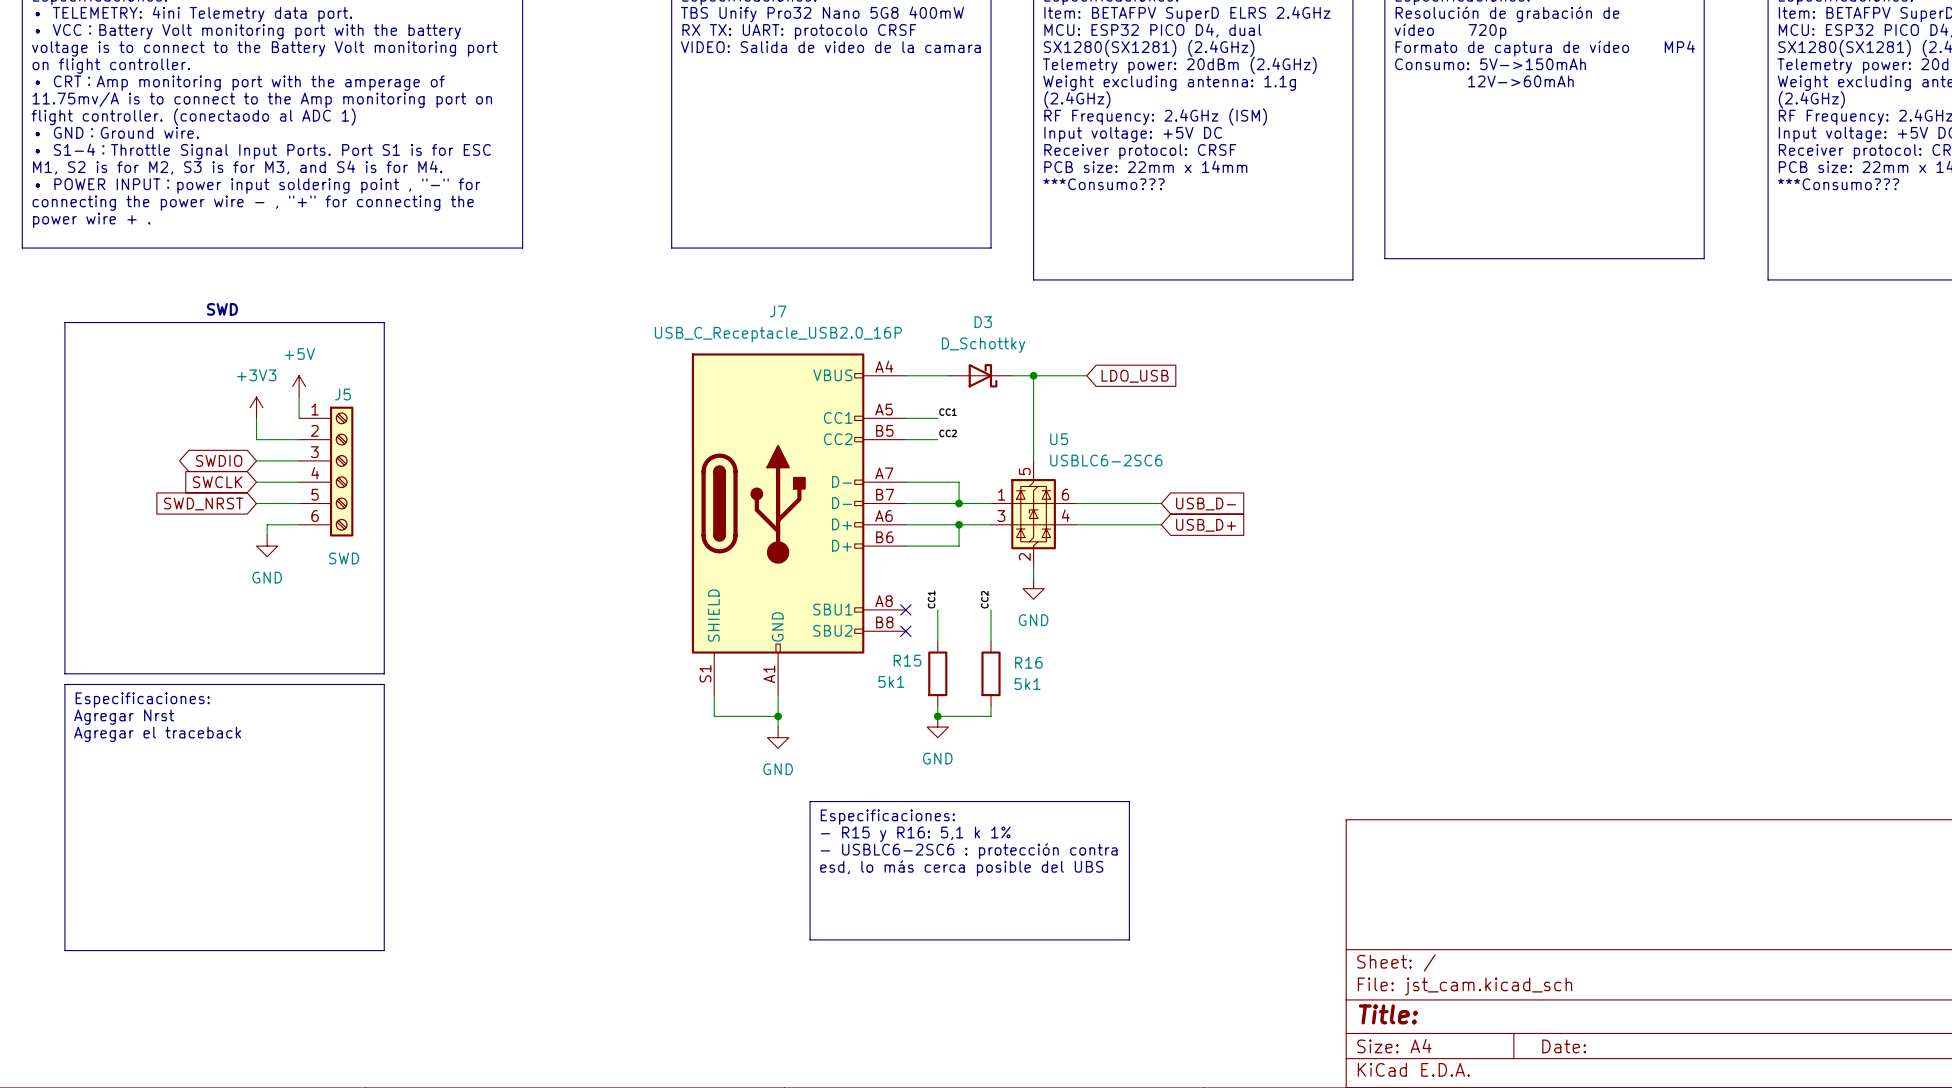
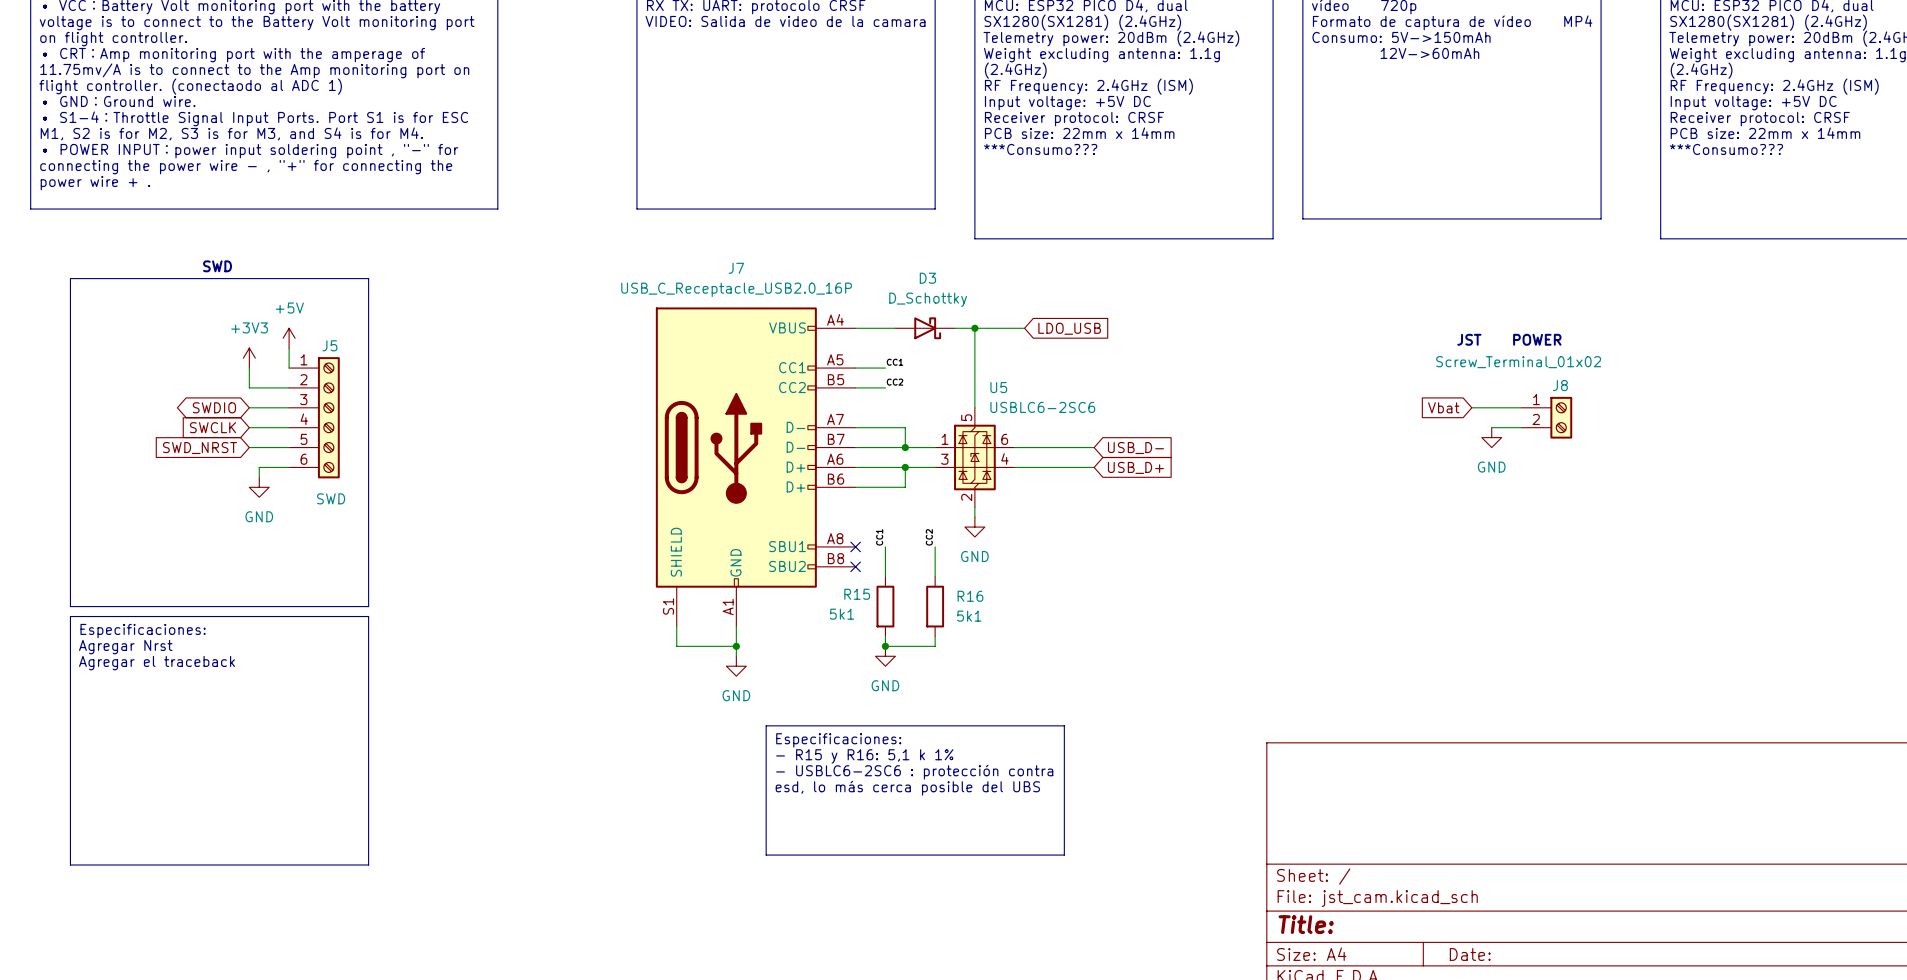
text: none -> JST POWER (1509, 339)
global label: none -> Vbat (1443, 407)
wire: none -> (1471, 407) (1521, 407)
J8: none -> Screw_Terminal_01x02 (1546, 417)
wire: none -> (1491, 427) (1521, 427)
power symbol: none -> GND (1491, 437)

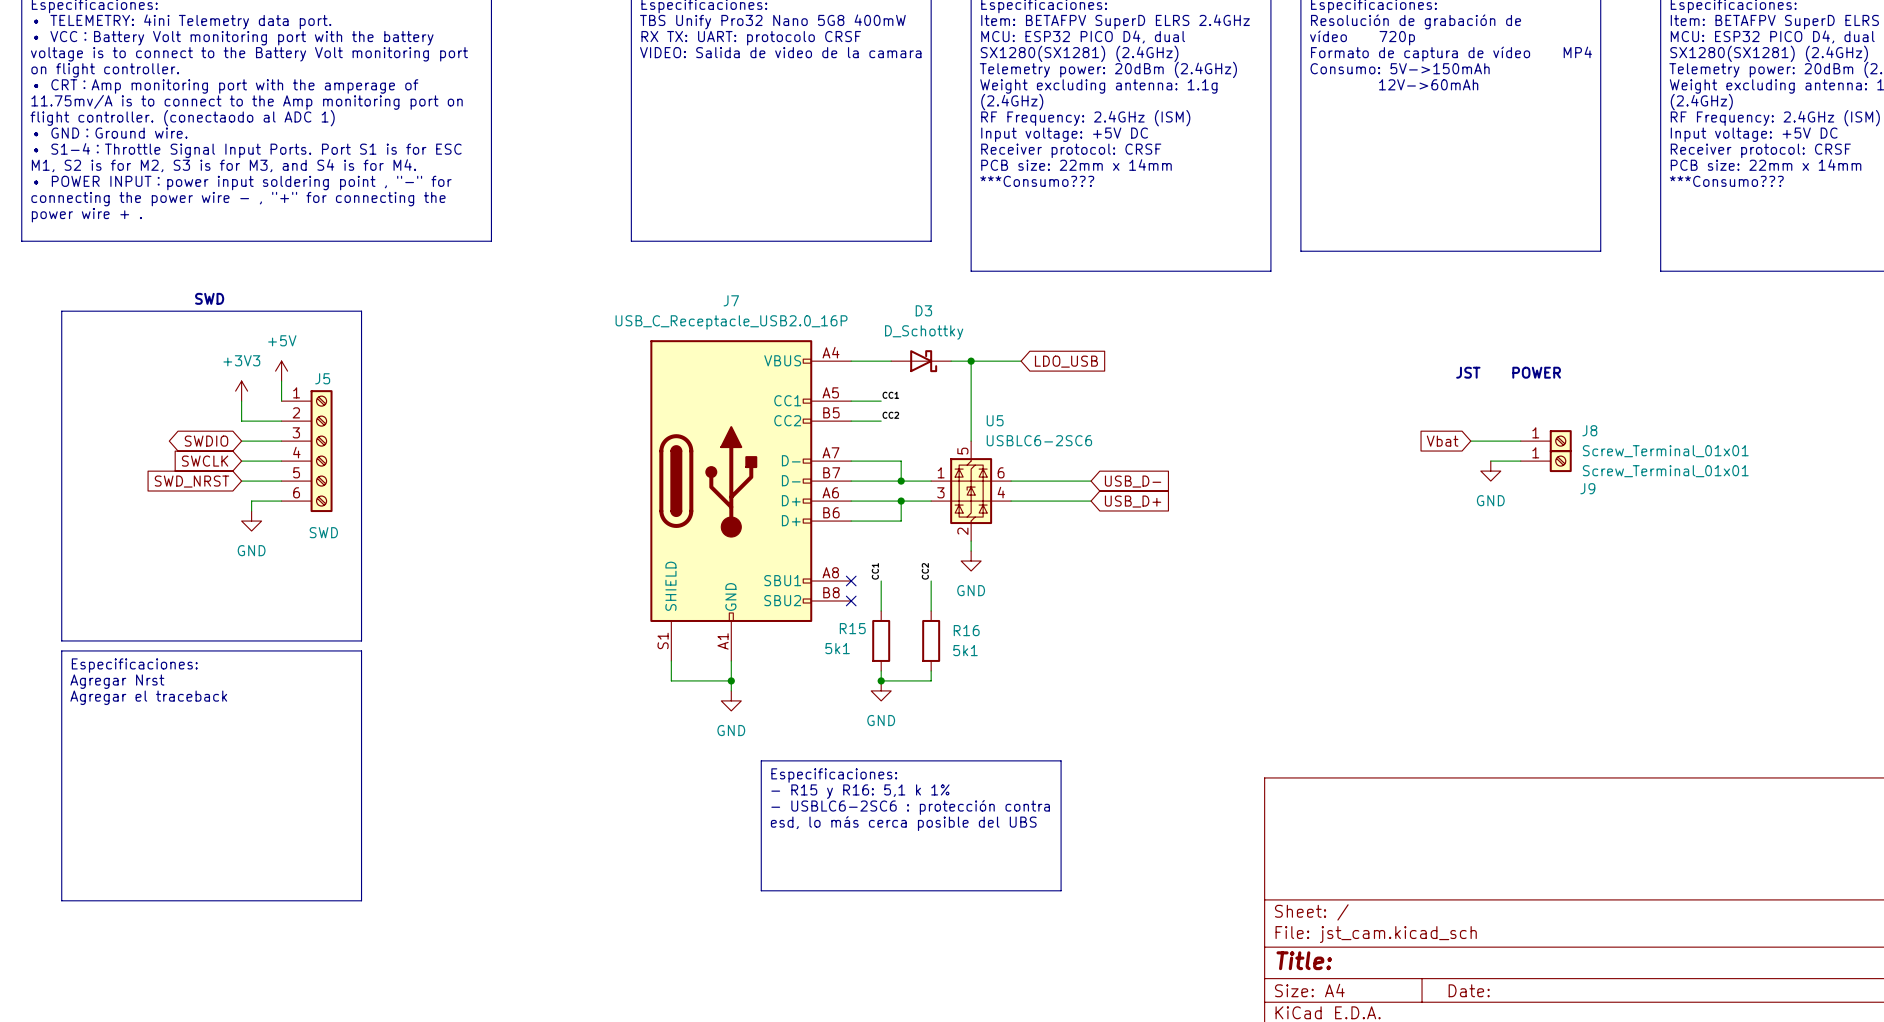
J8 value: Screw_Terminal_01x02 (1518, 362) -> Screw_Terminal_01x01 (1665, 451)
J8 name position: J8 (1560, 385) -> J8 (1589, 430)
J8 symbol: [1521, 396, 1573, 439] -> [1520, 430, 1572, 453]
J9: none -> Screw_Terminal_01x01 (1546, 461)

